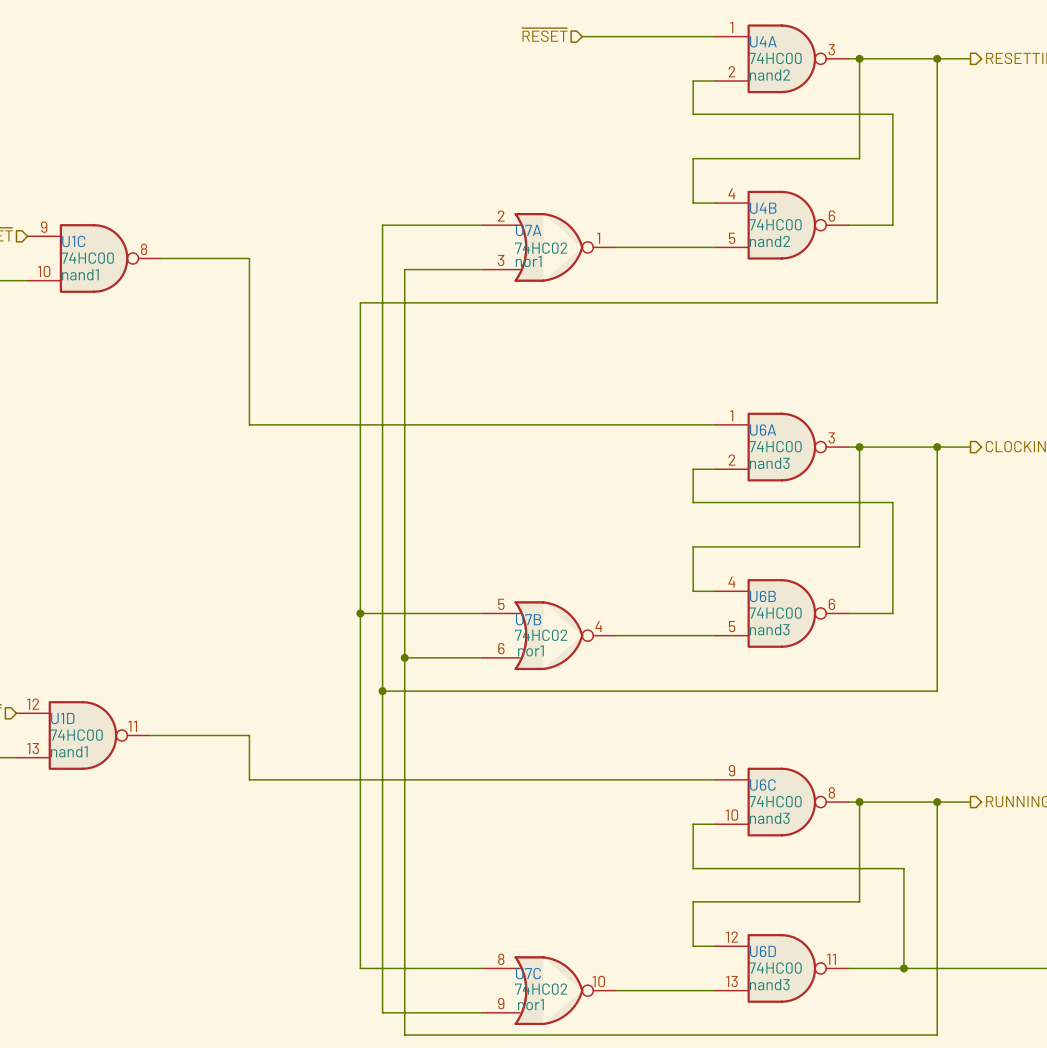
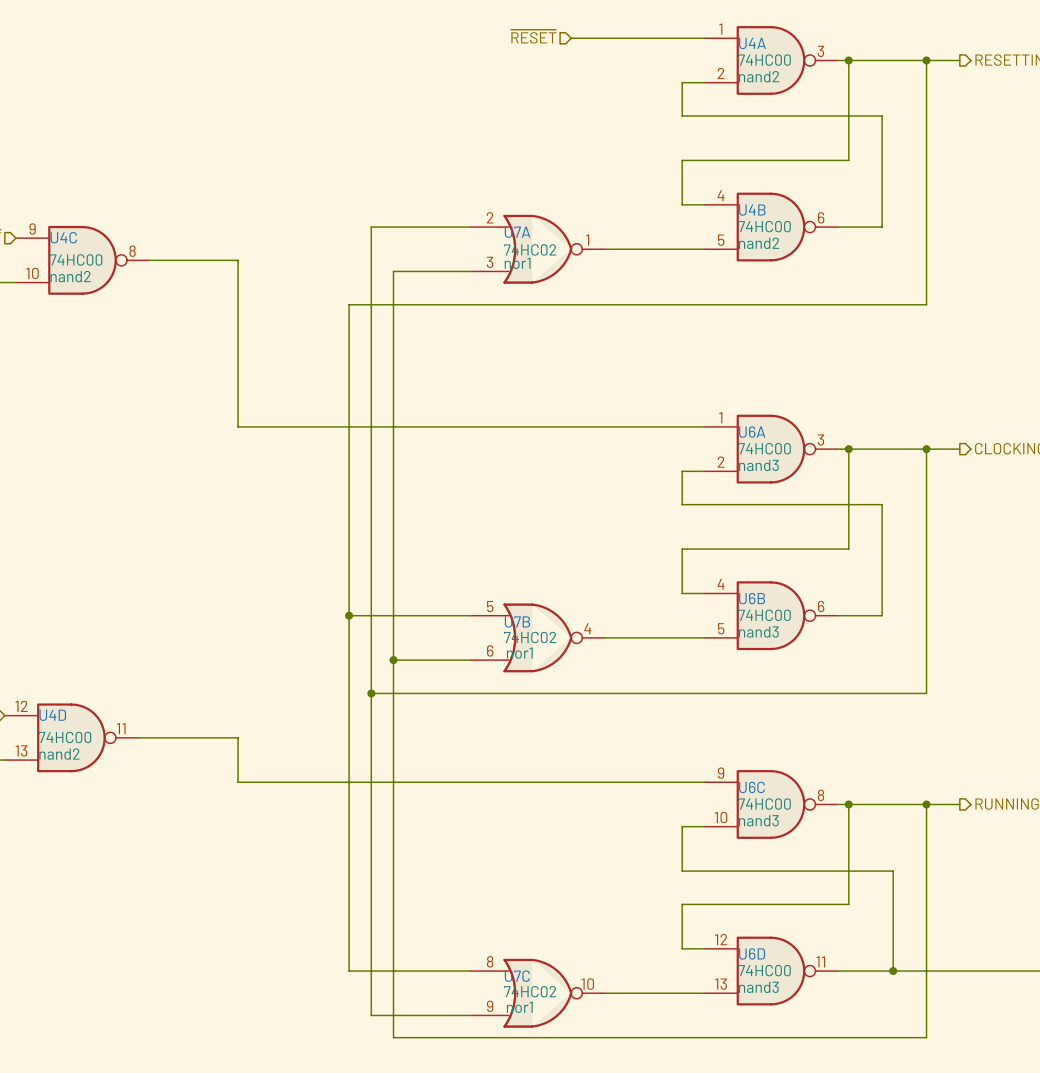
U1C name: U1C (73, 241) -> U4C (63, 237)
U1C text: nand1 (80, 274) -> nand2 (70, 276)
U1D name: U1D (62, 718) -> U4D (52, 715)
U1D text: nand1 (69, 751) -> nand2 (59, 754)

